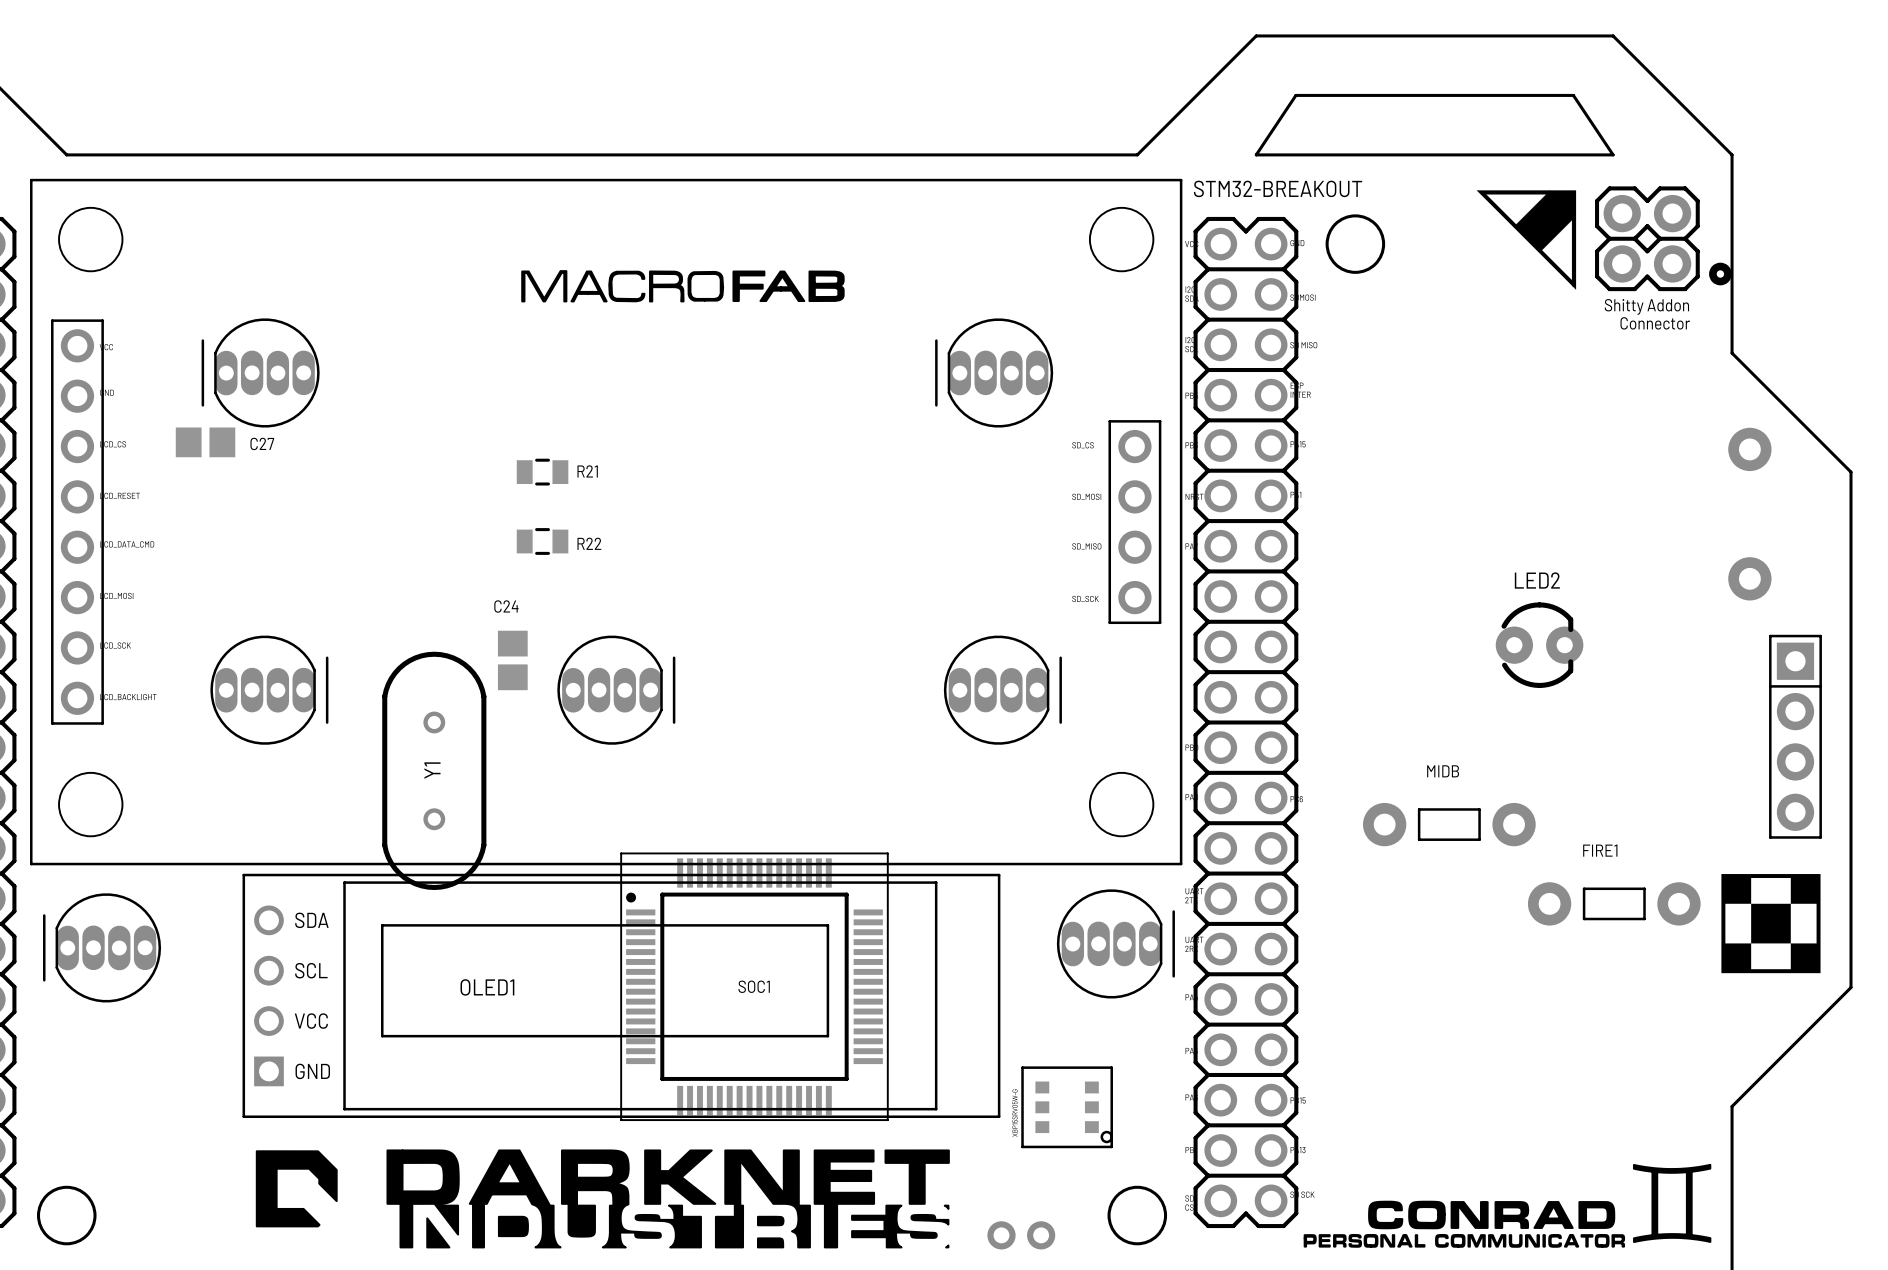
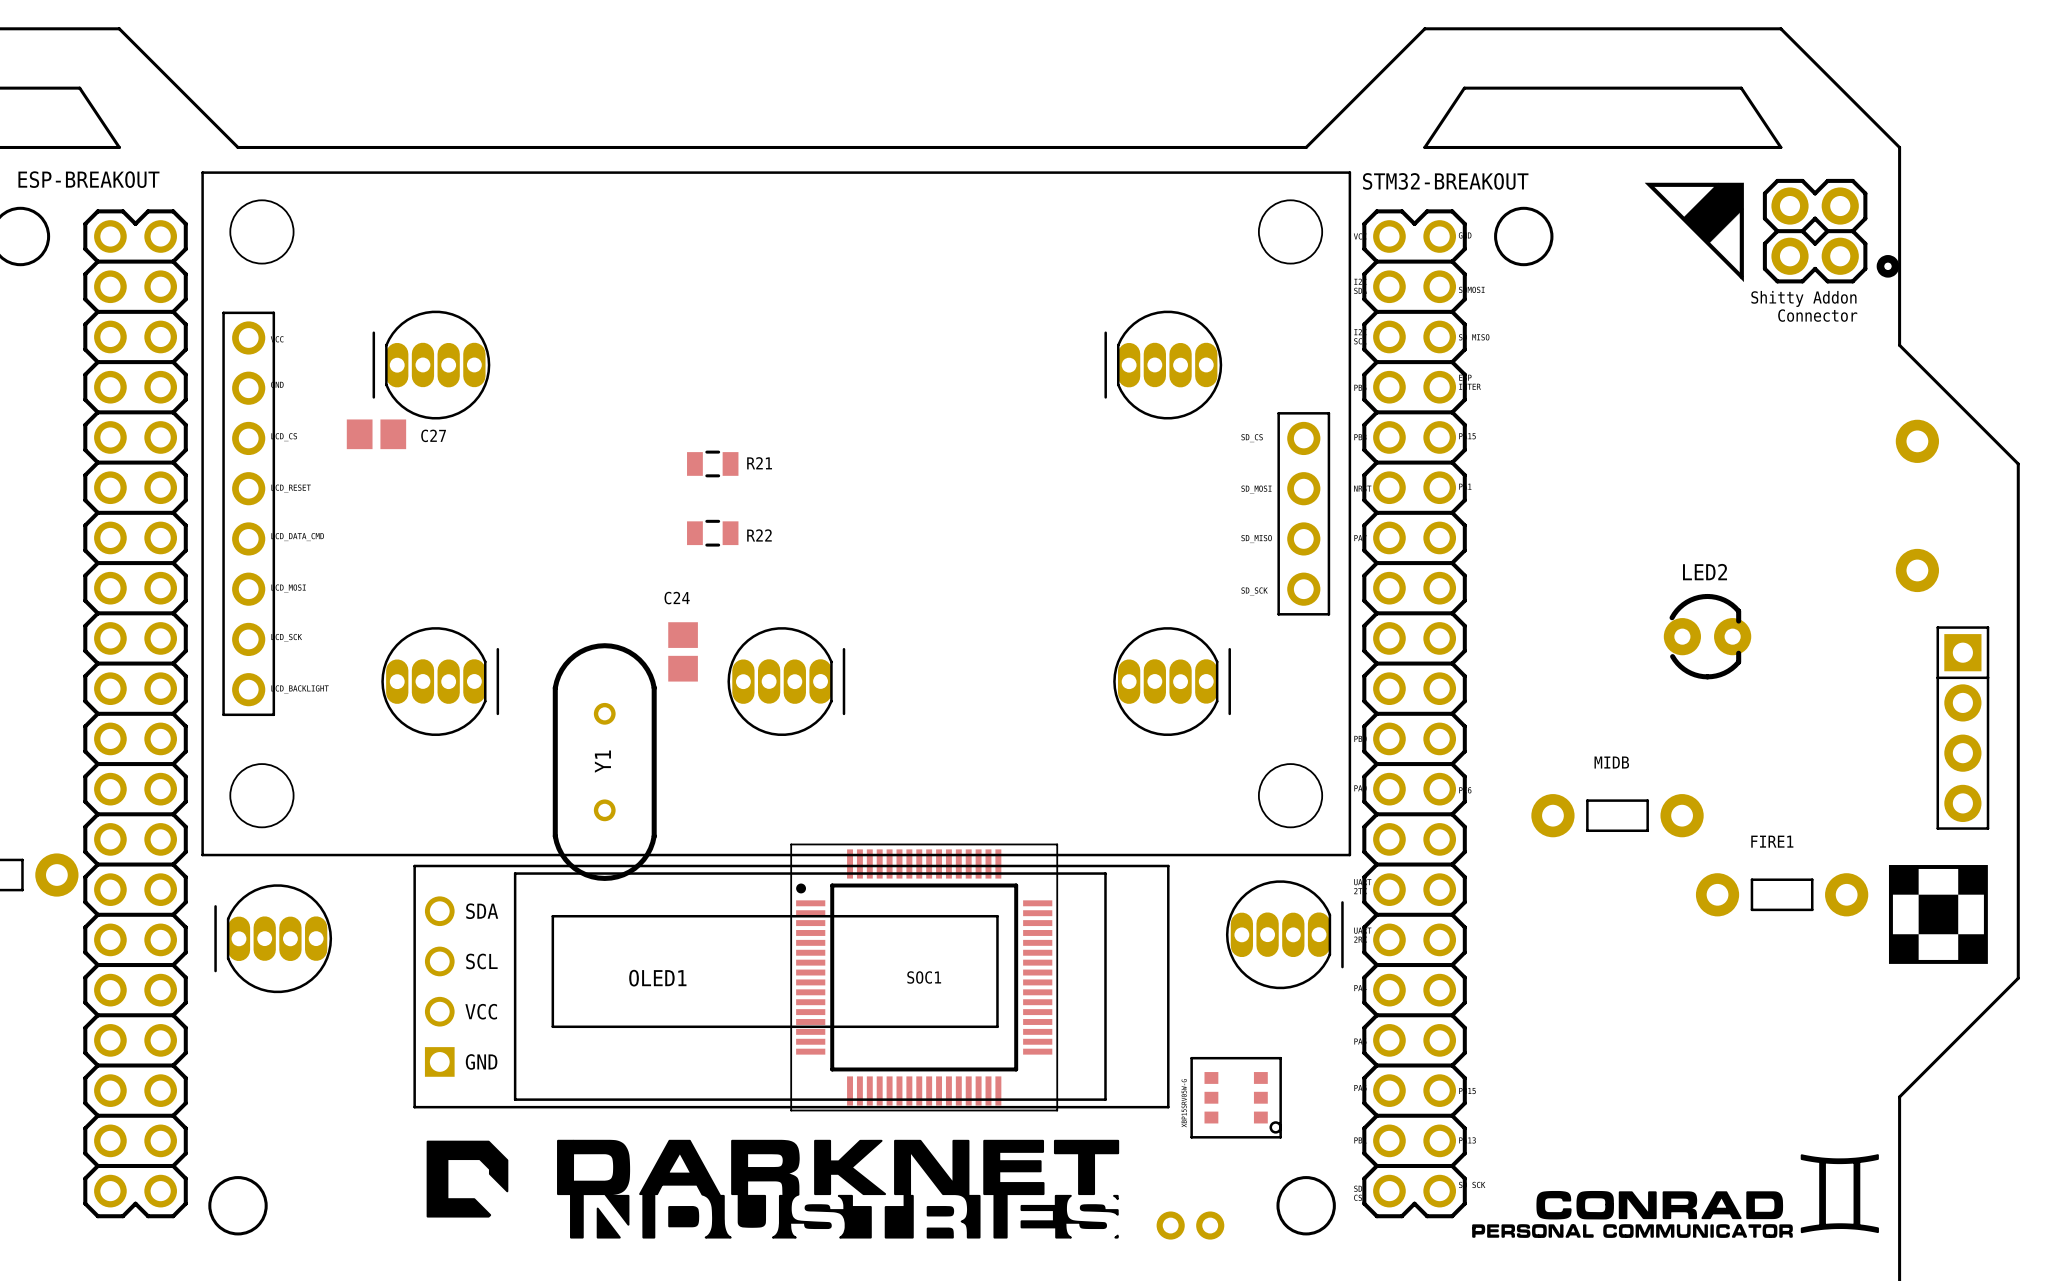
drawing: [521, 270, 845, 303] -> none

